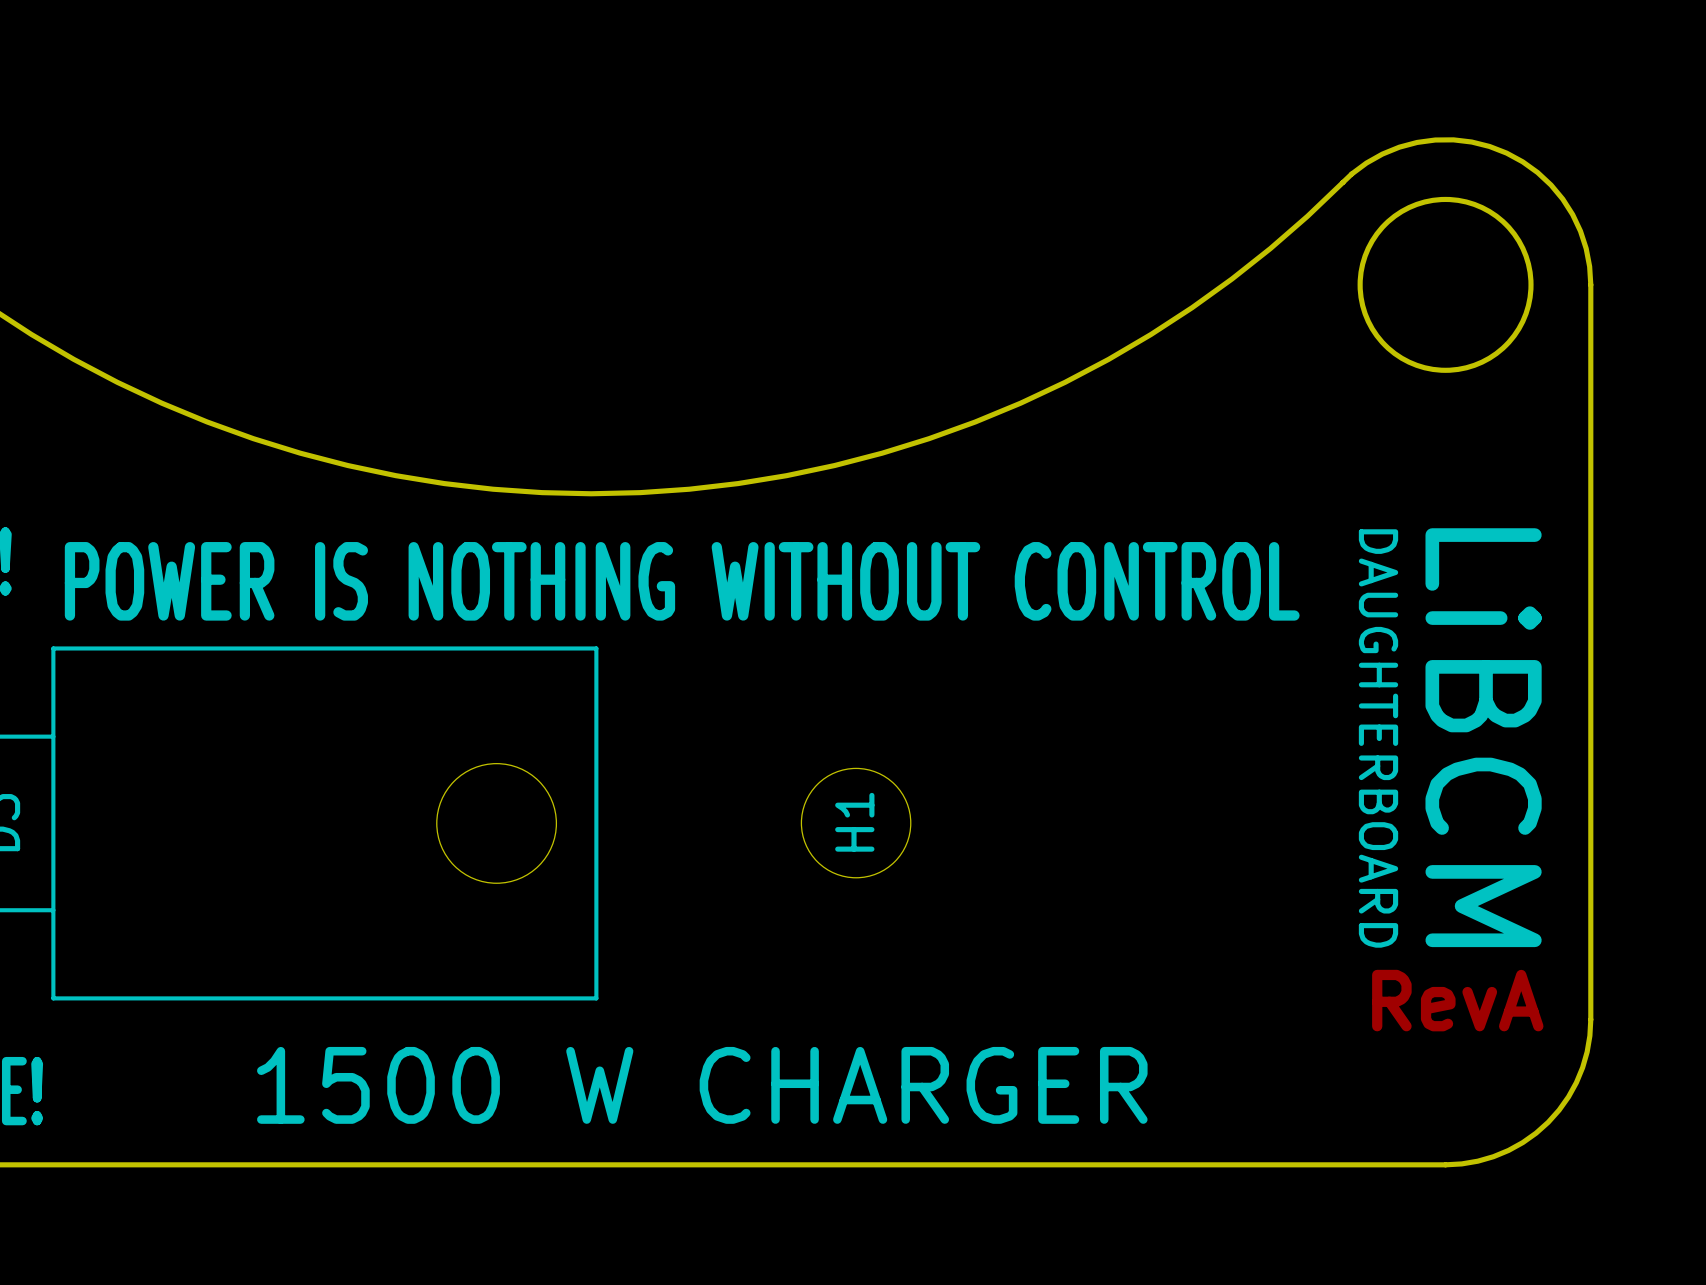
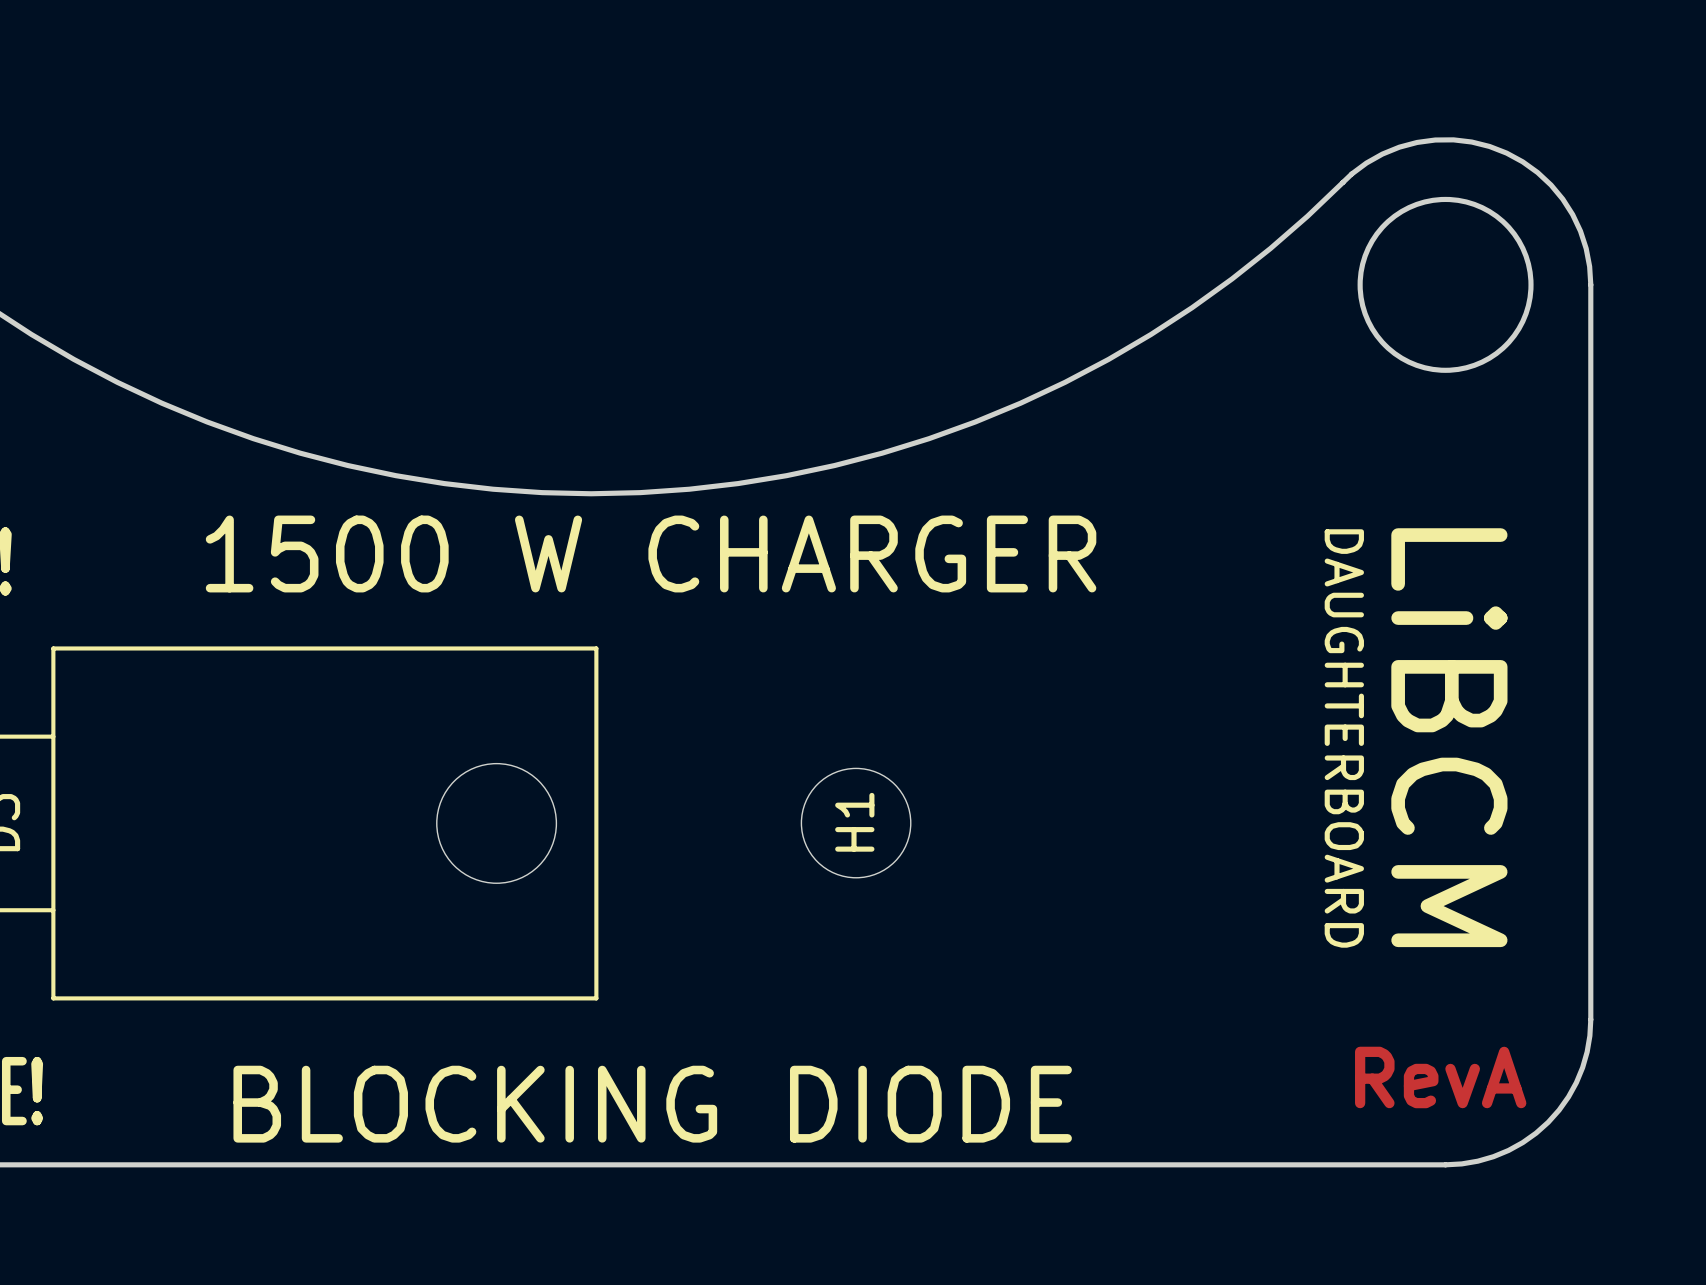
text: POWER IS NOTHING WITHOUT CONTROL (682, 581) -> none
text position: LiBCM (1483, 737) -> LiBCM (1449, 737)
text position: DAUGHTERBOARD (1378, 738) -> DAUGHTERBOARD (1344, 738)
text position: RevA (1457, 1000) -> RevA (1440, 1077)
text position: 1500 W CHARGER (702, 1085) -> 1500 W CHARGER (651, 553)
text: none -> BLOCKING DIODE (652, 1104)

